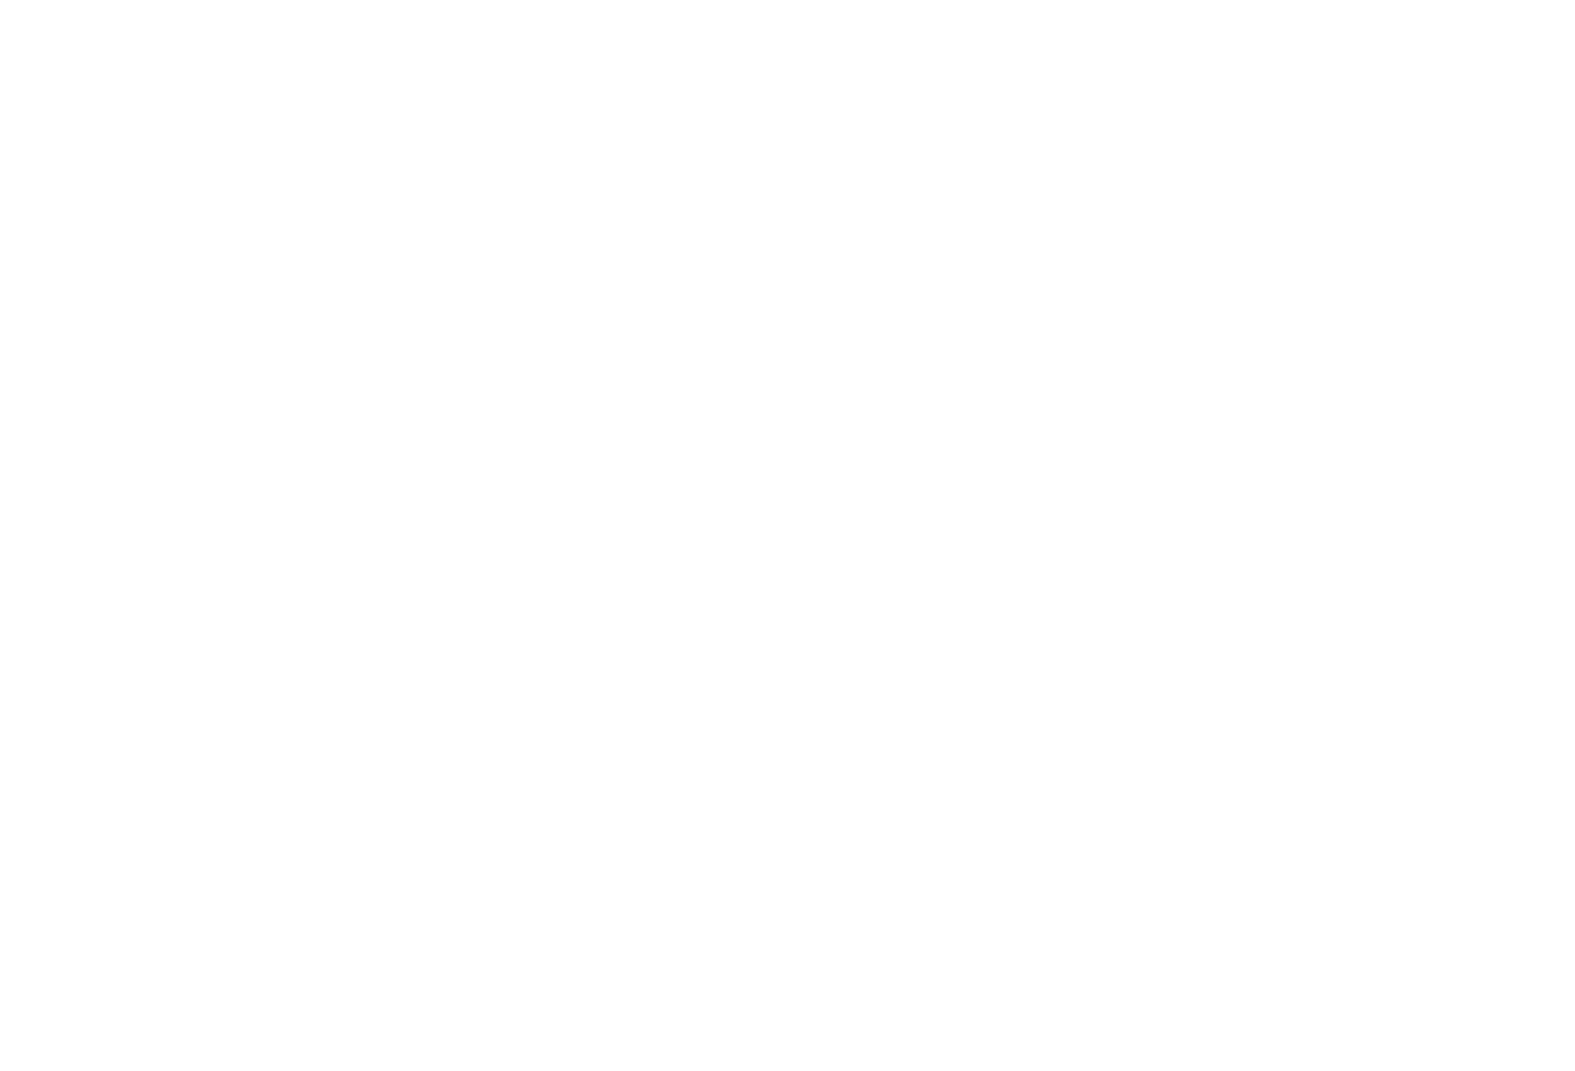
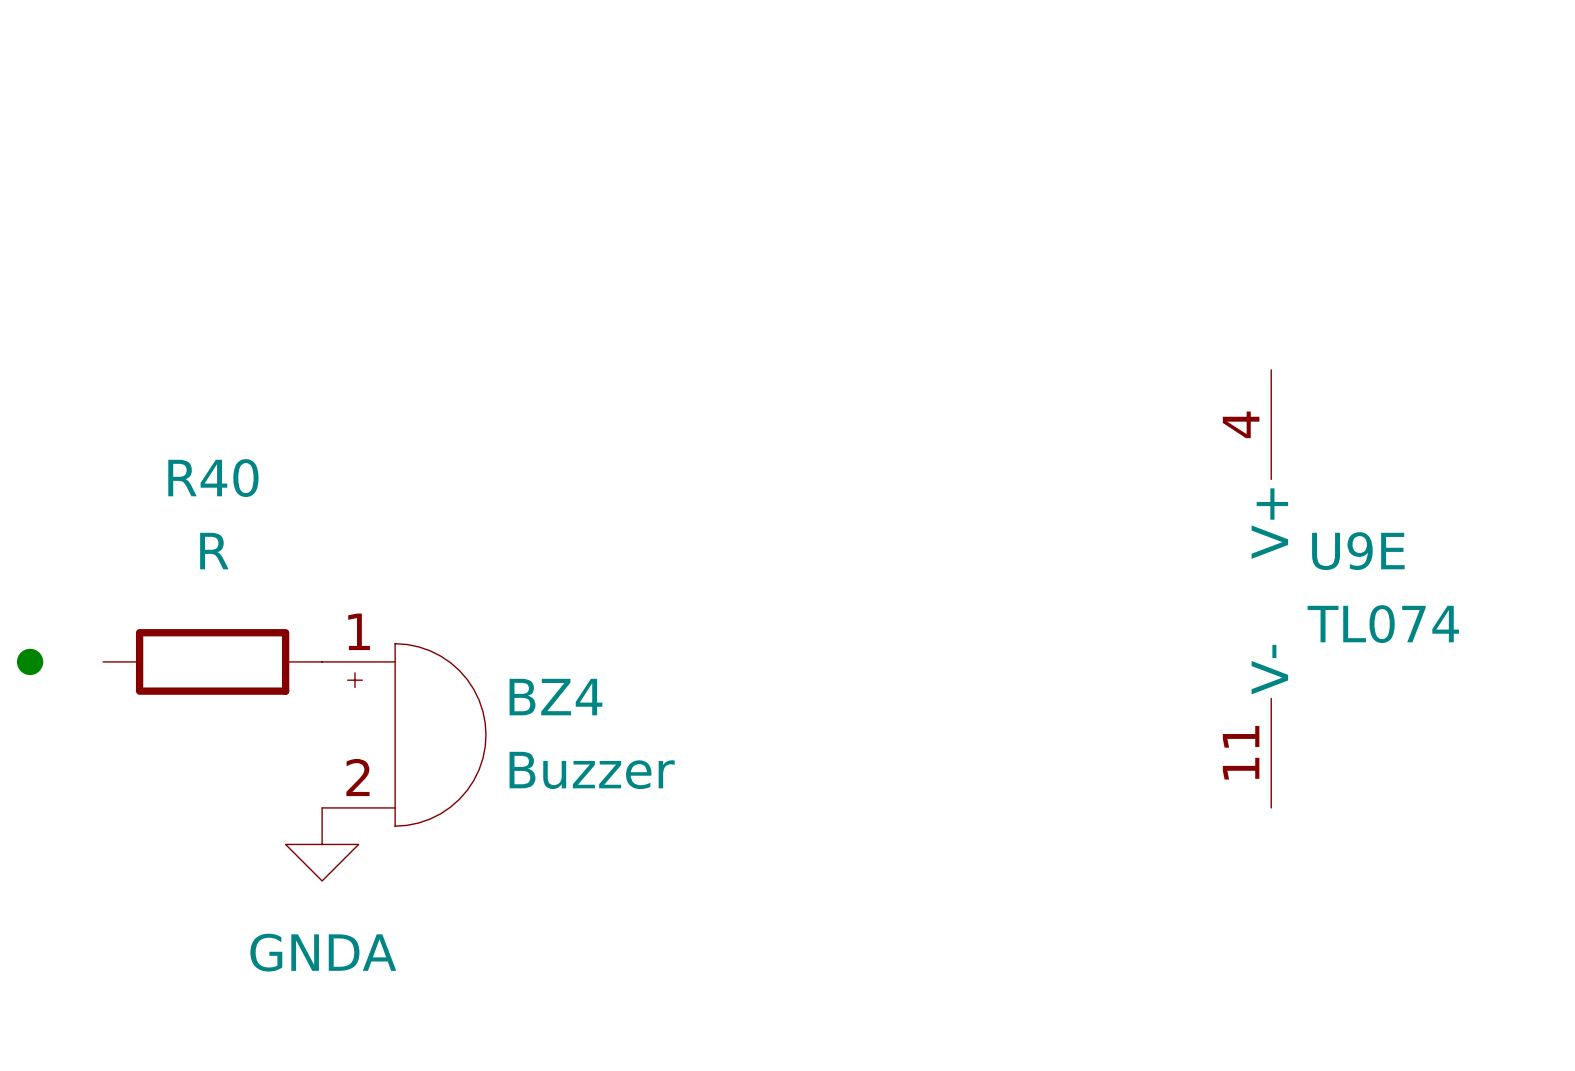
U9E: none -> TL074 (1271, 588)
junction: none -> (30, 661)
R40: none -> R (212, 661)
BZ4: none -> Buzzer (404, 734)
power symbol: none -> GNDA (322, 844)

